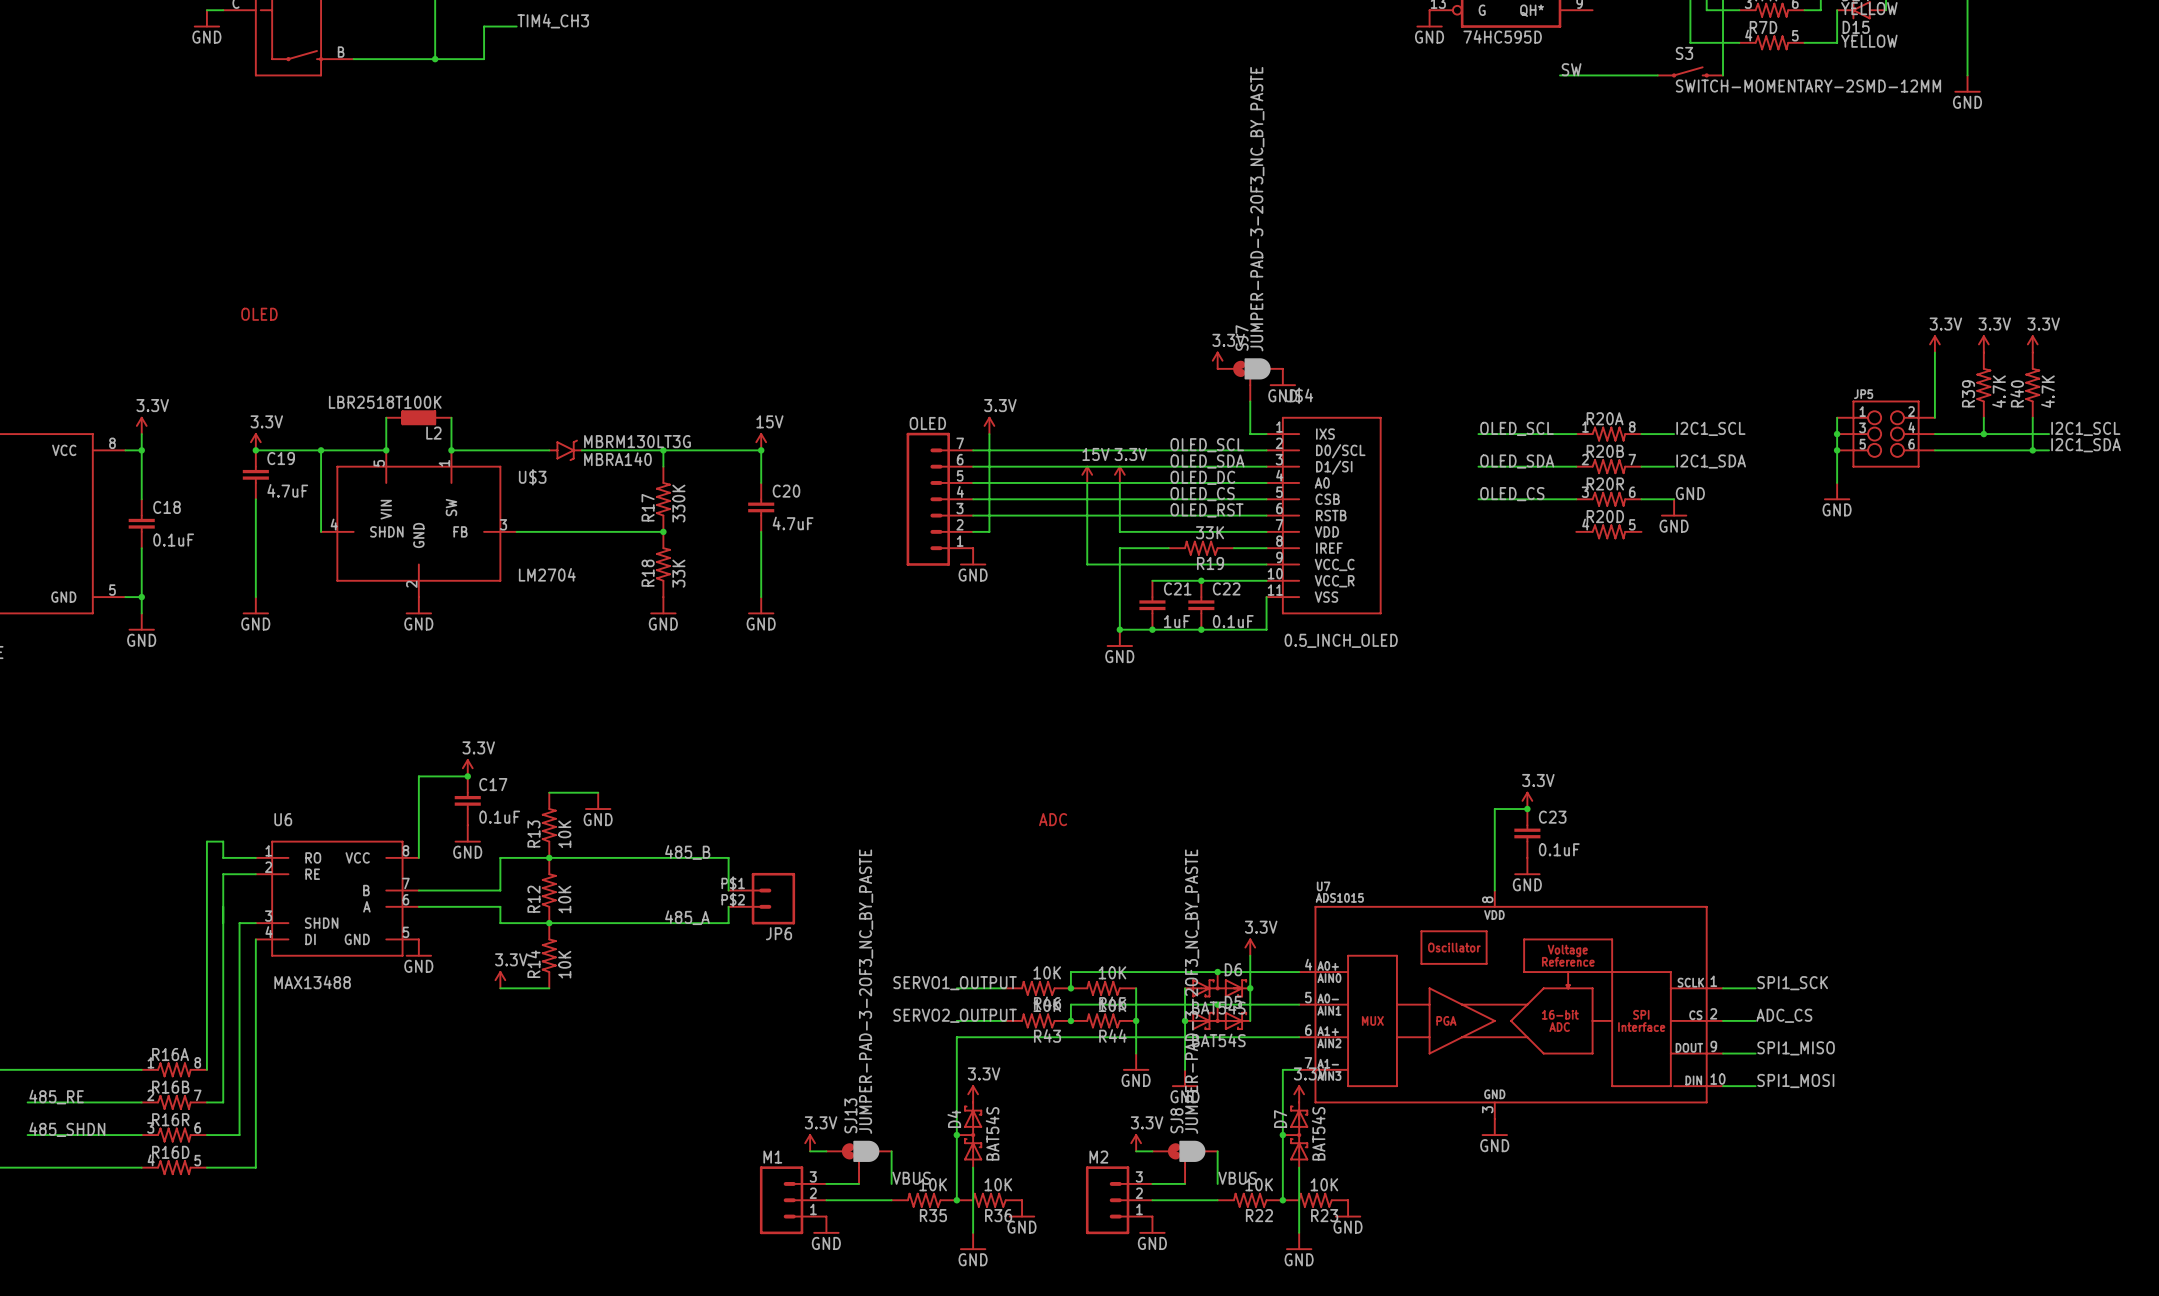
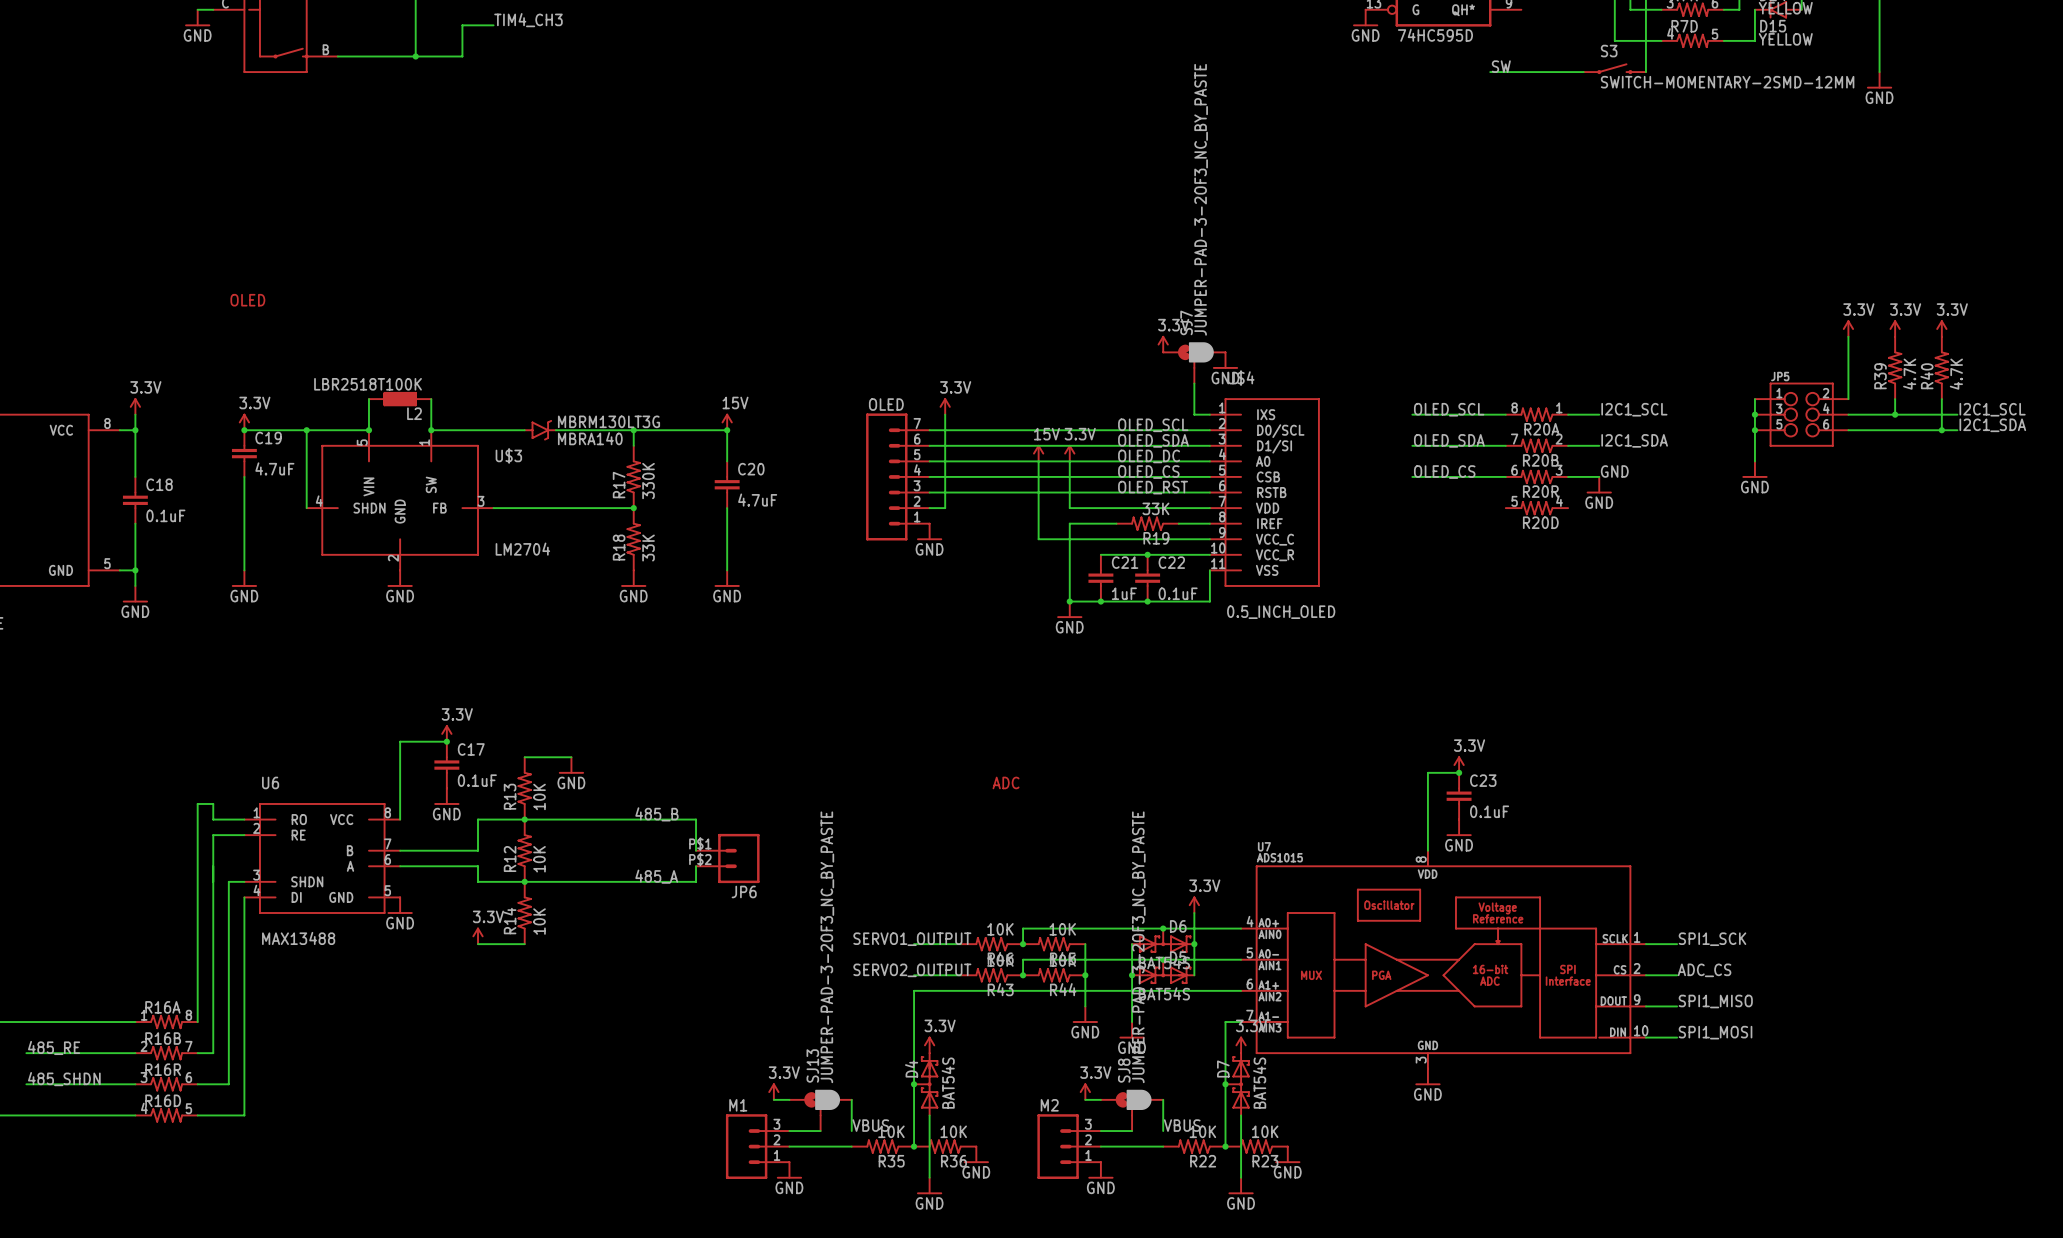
R20A rotation: 0° (1608, 434) -> 180° (1536, 414)
R20B rotation: 0° (1608, 466) -> 180° (1536, 445)
R20R rotation: 0° (1608, 499) -> 180° (1536, 476)
R20D rotation: 0° (1608, 531) -> 180° (1536, 508)

